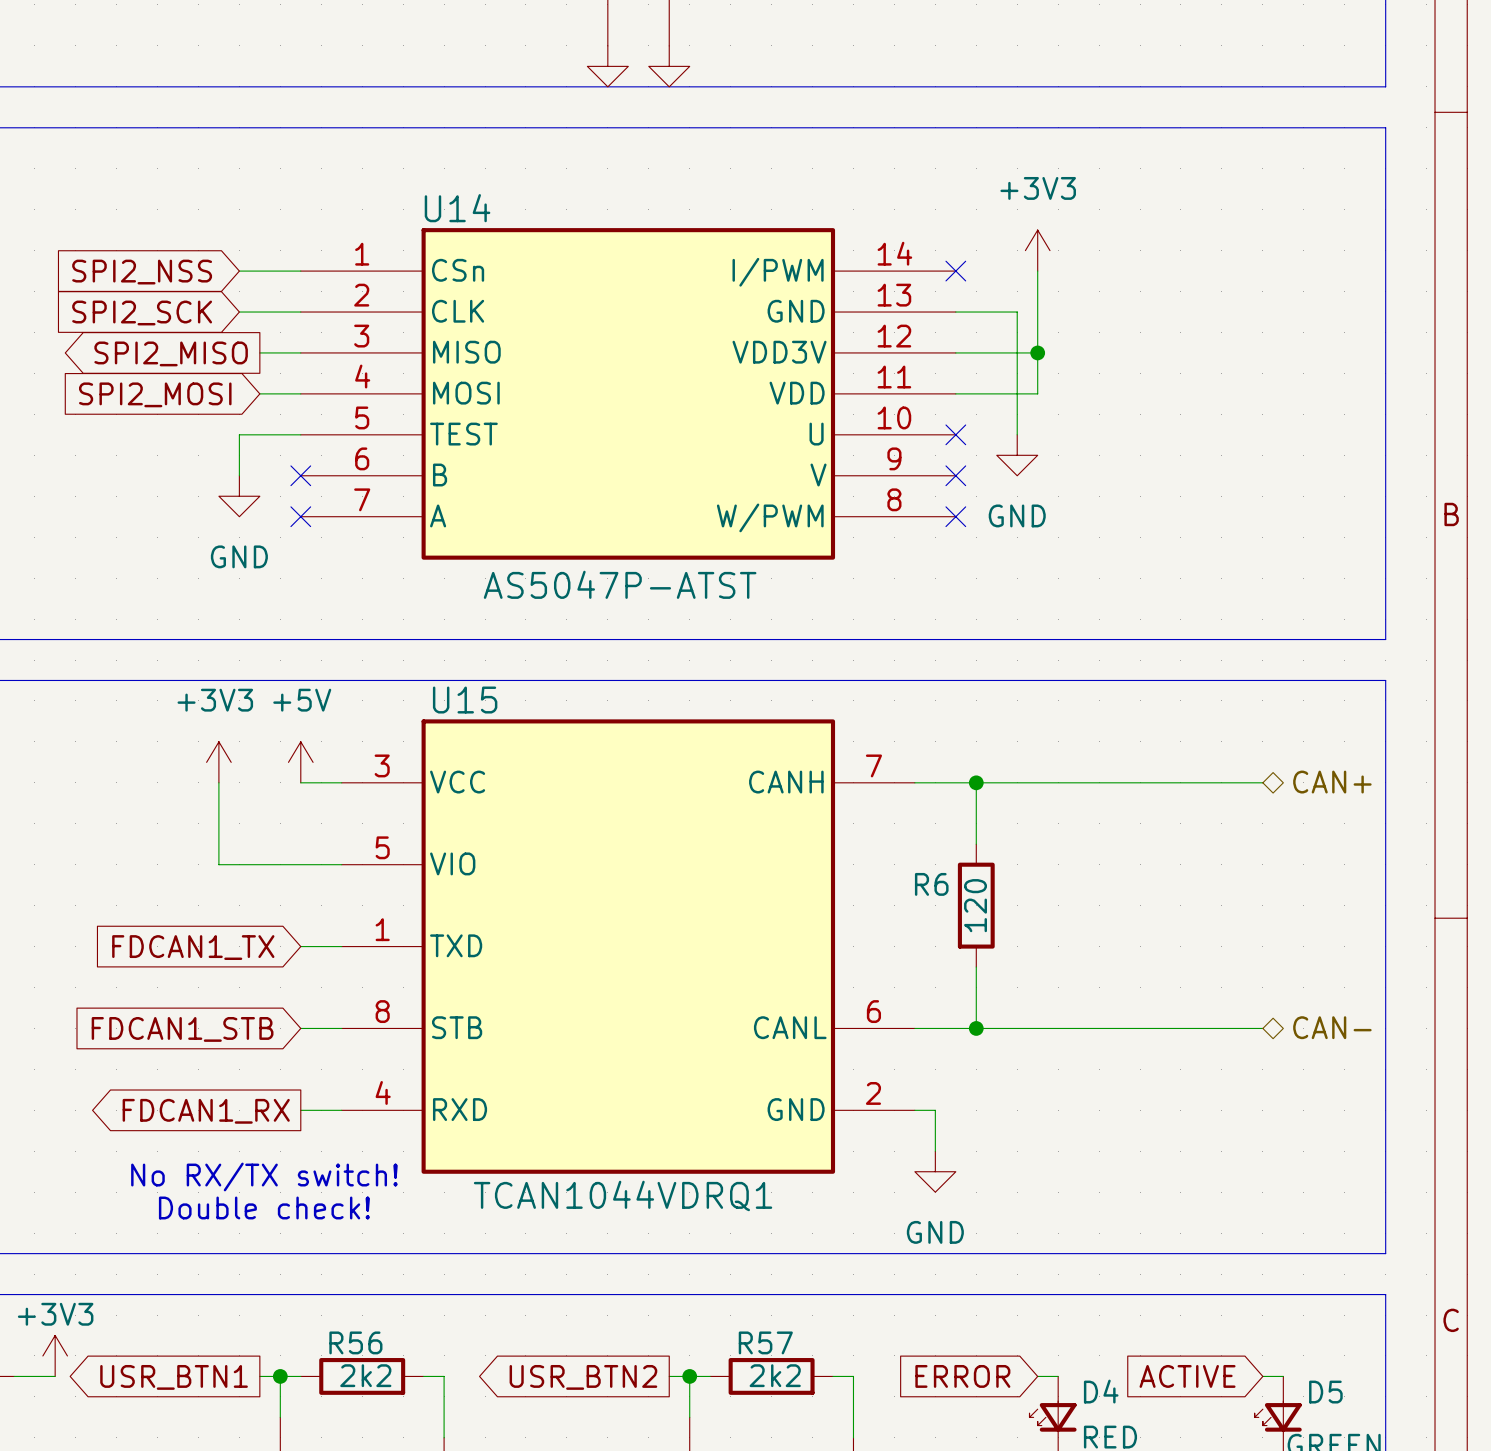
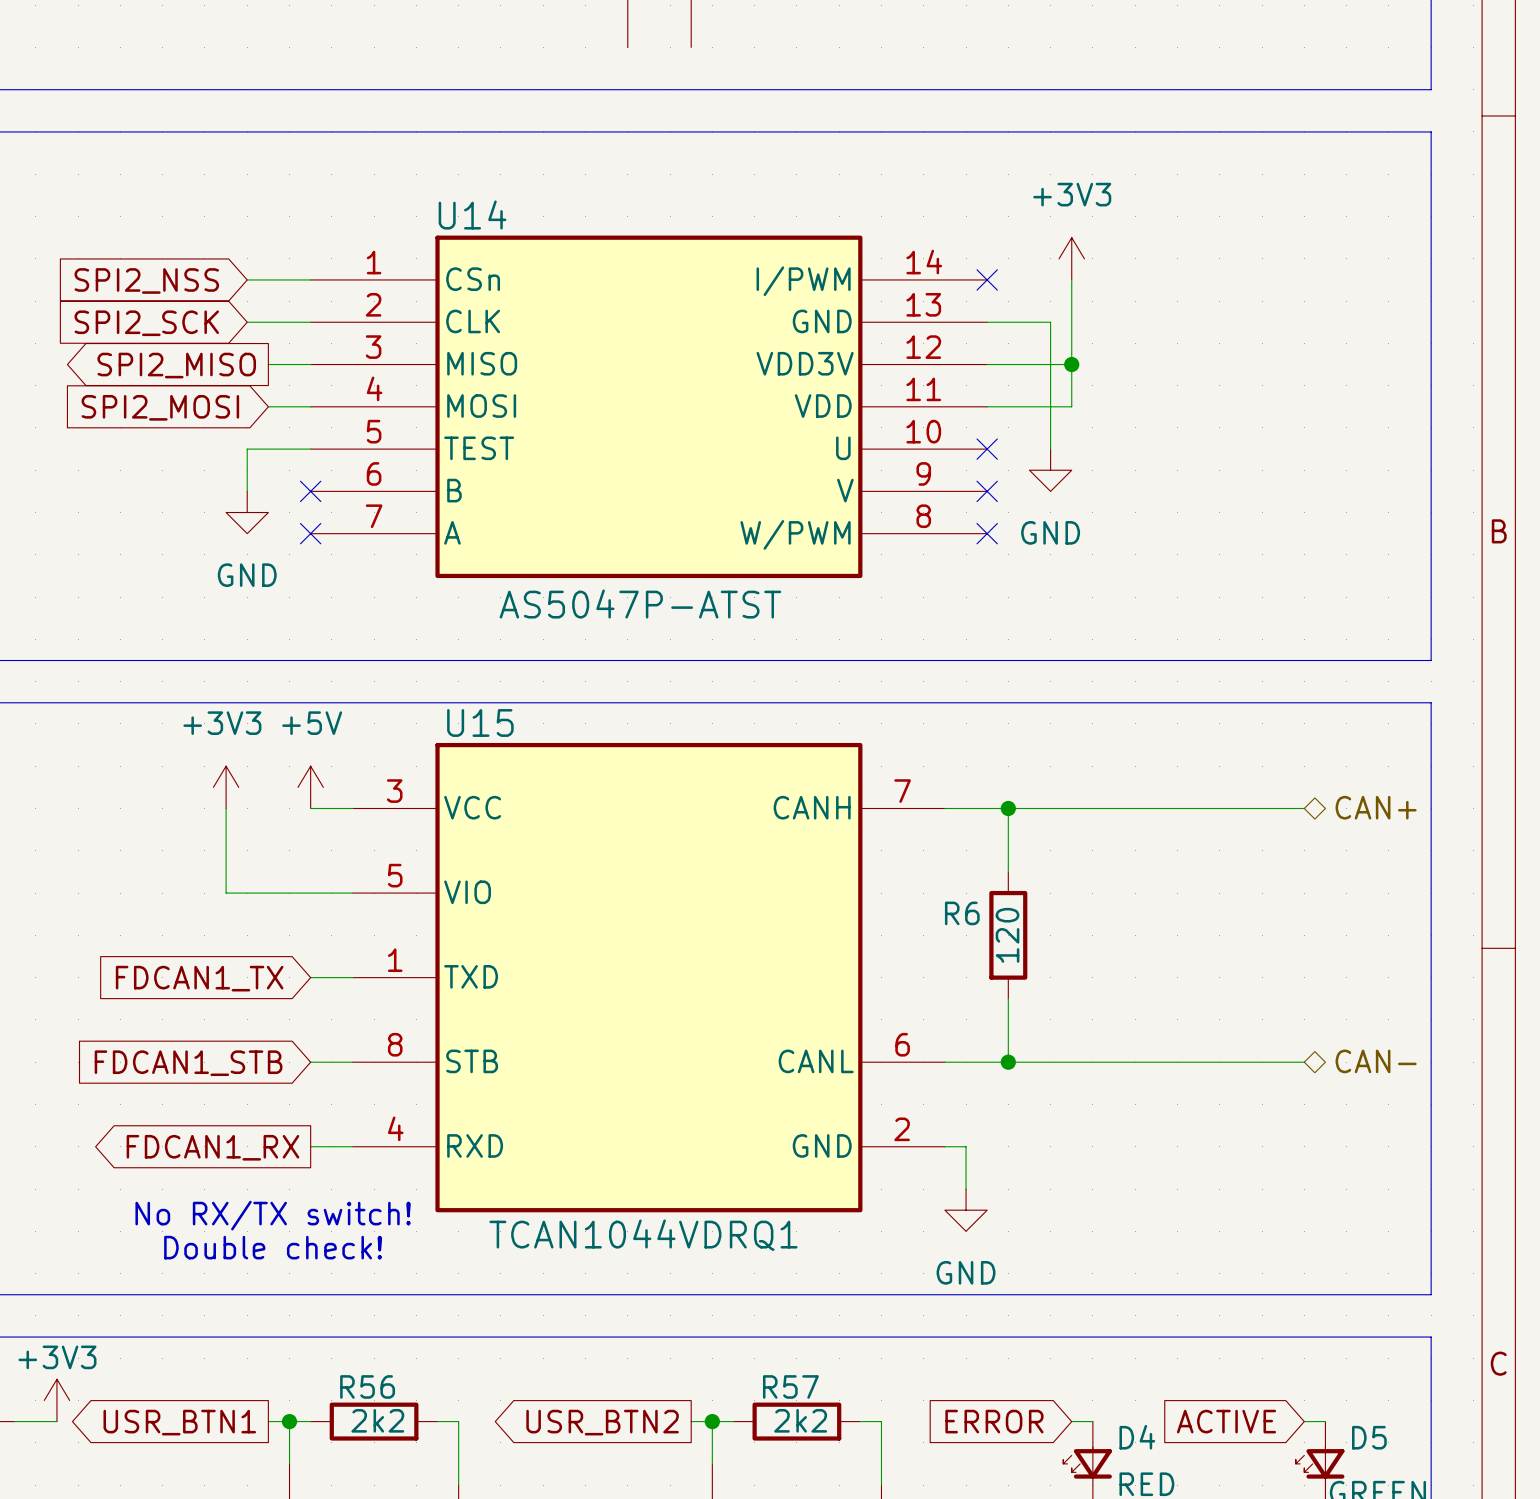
power symbol: (607, 66) -> none
power symbol: (669, 66) -> none

